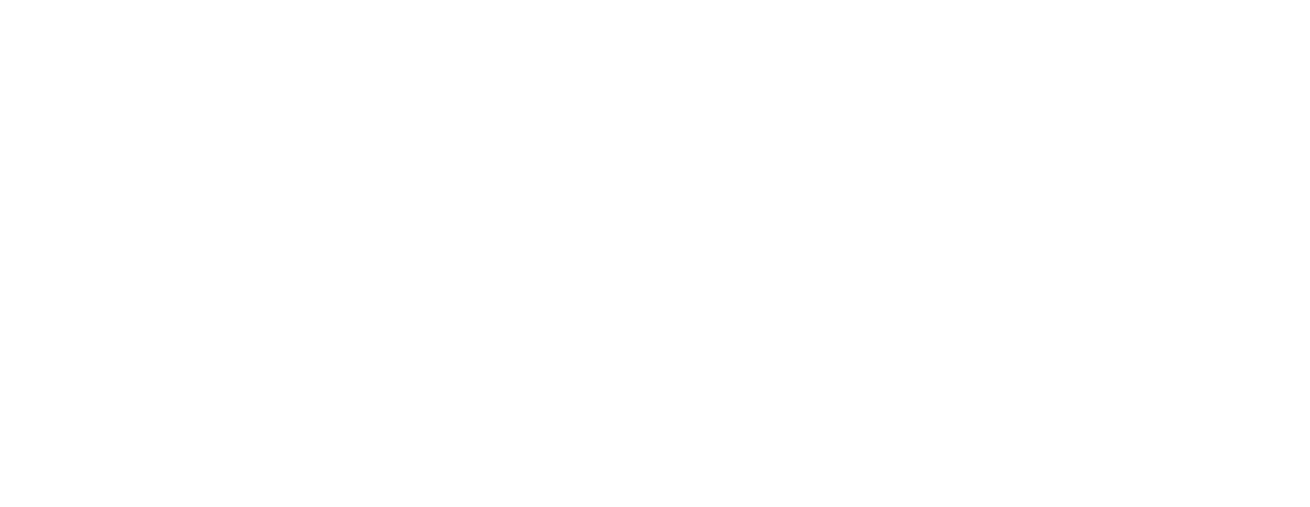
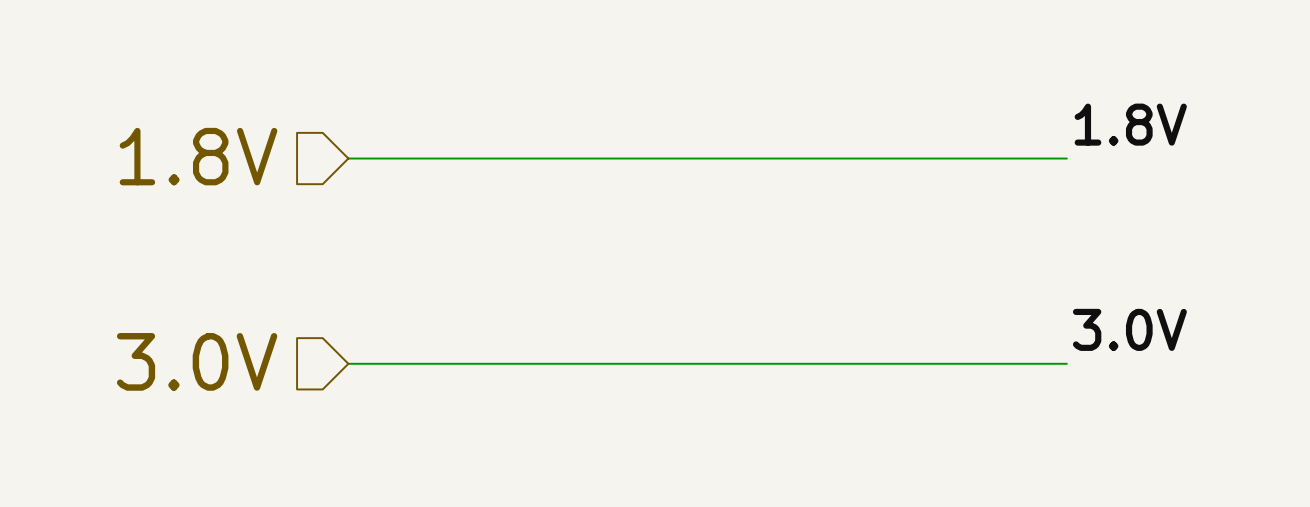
label: none -> 1.8V (1130, 124)
hierarchical label: none -> 1.8V (198, 156)
wire: none -> (348, 158) (1066, 158)
label: none -> 3.0V (1129, 329)
hierarchical label: none -> 3.0V (197, 361)
wire: none -> (348, 363) (1066, 363)

